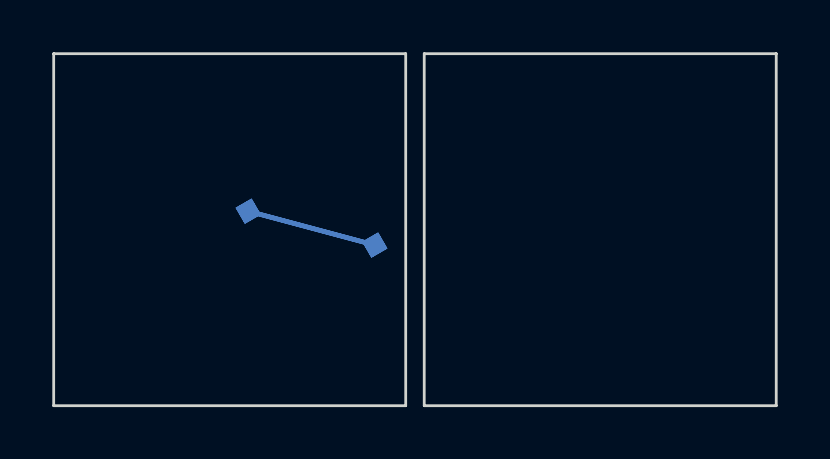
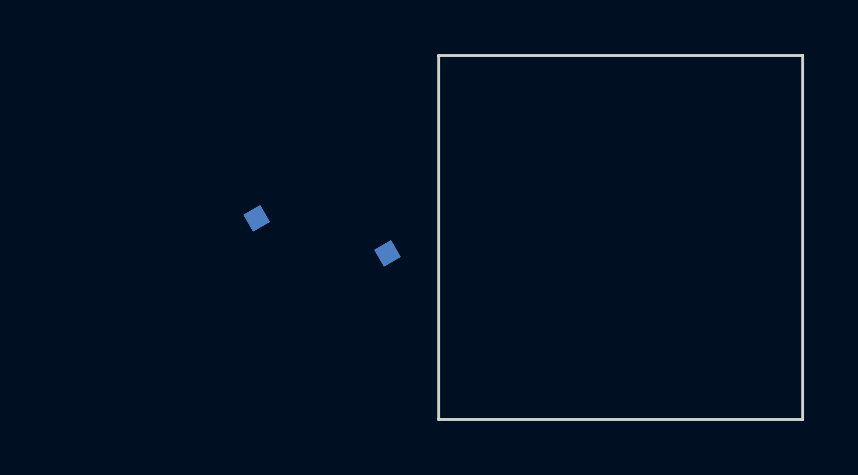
board edge: (405, 53) (53, 53) (53, 405) (405, 405) (405, 53) -> none
track: (248, 211) (374, 245) -> none

